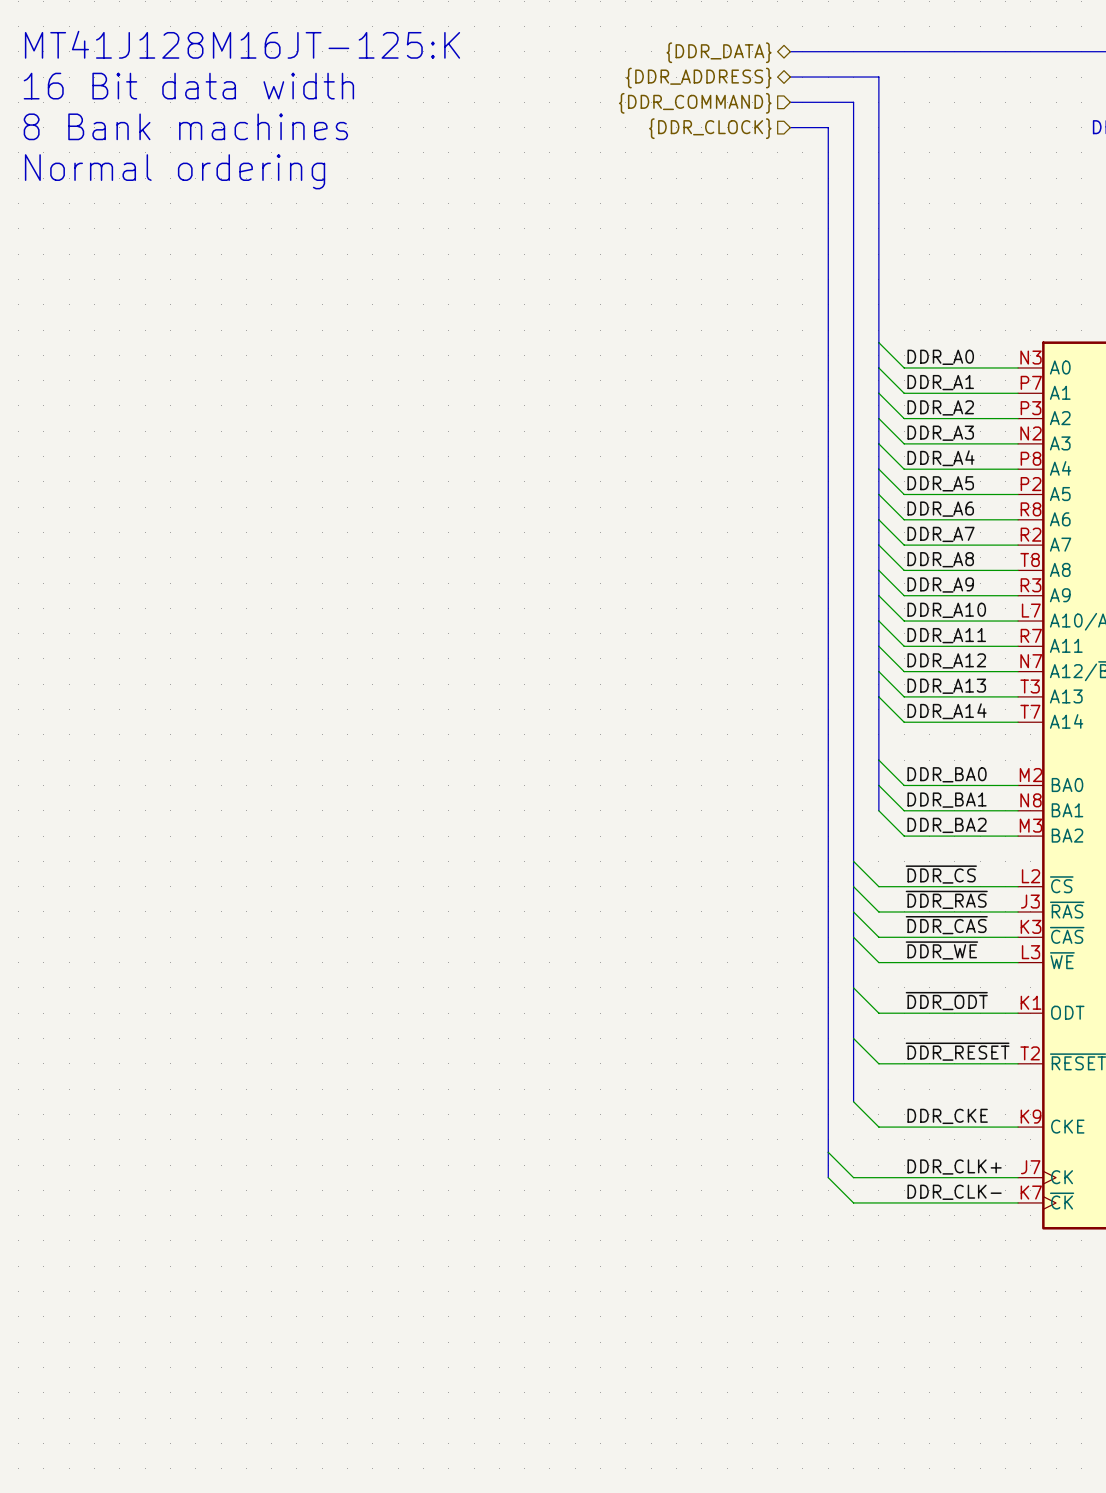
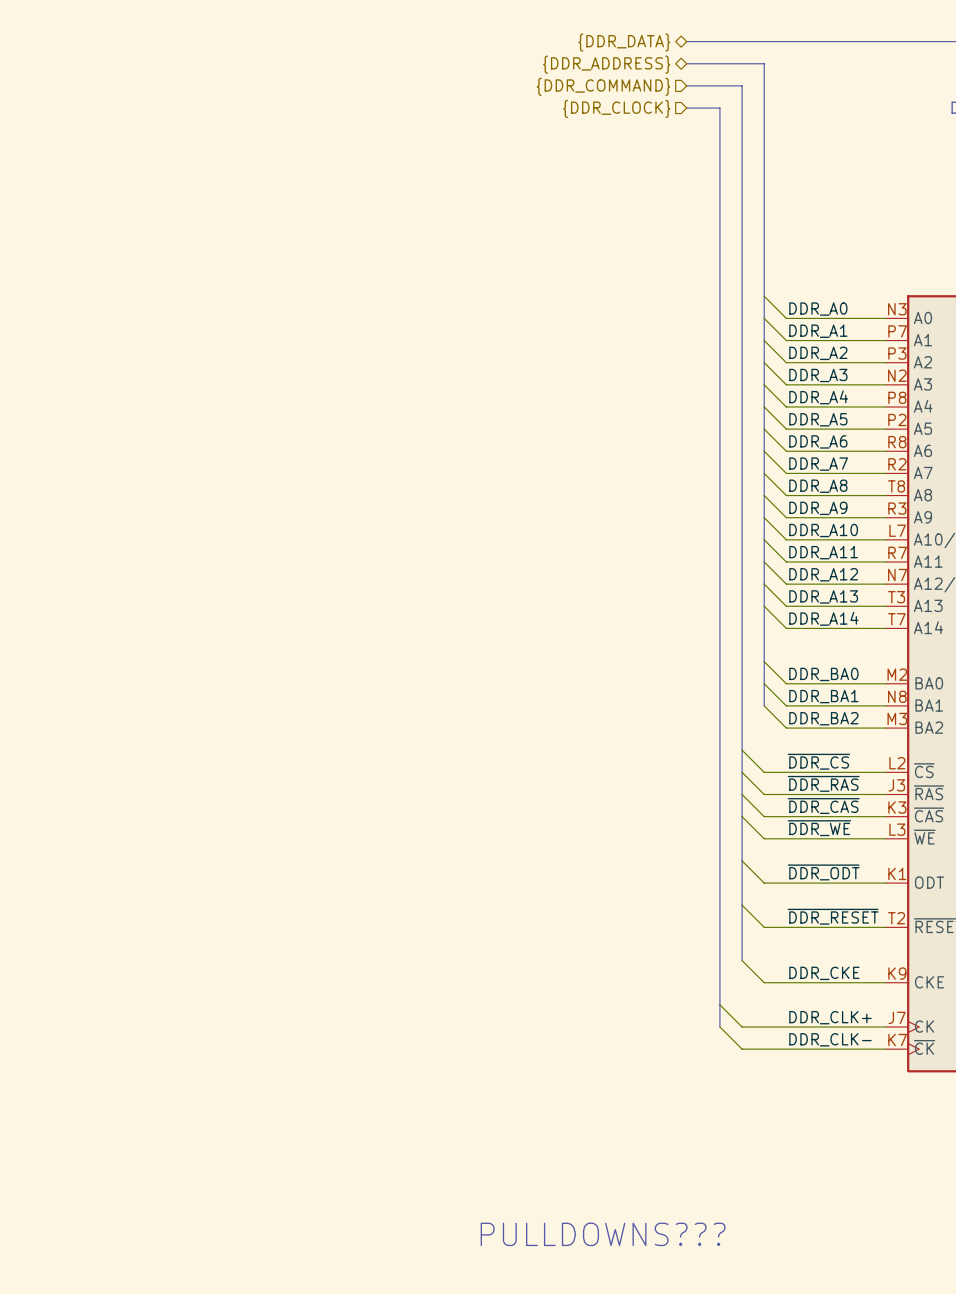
text: MT41J128M16JT-125:K (242, 44) -> none
text: 16 Bit data width (188, 86) -> none
text: 8 Bank machines (185, 126) -> none
text: Normal ordering (175, 171) -> none
text: none -> PULLDOWNS??? (603, 1234)

